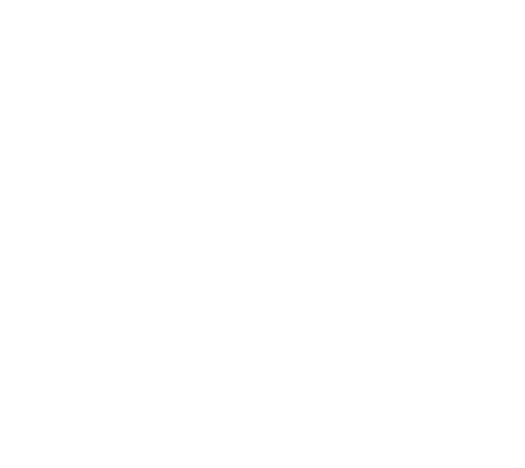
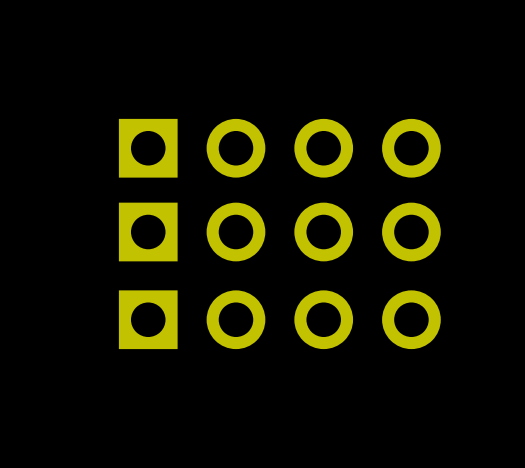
part: none -> (279, 148)
part: none -> (279, 232)
part: none -> (279, 319)

